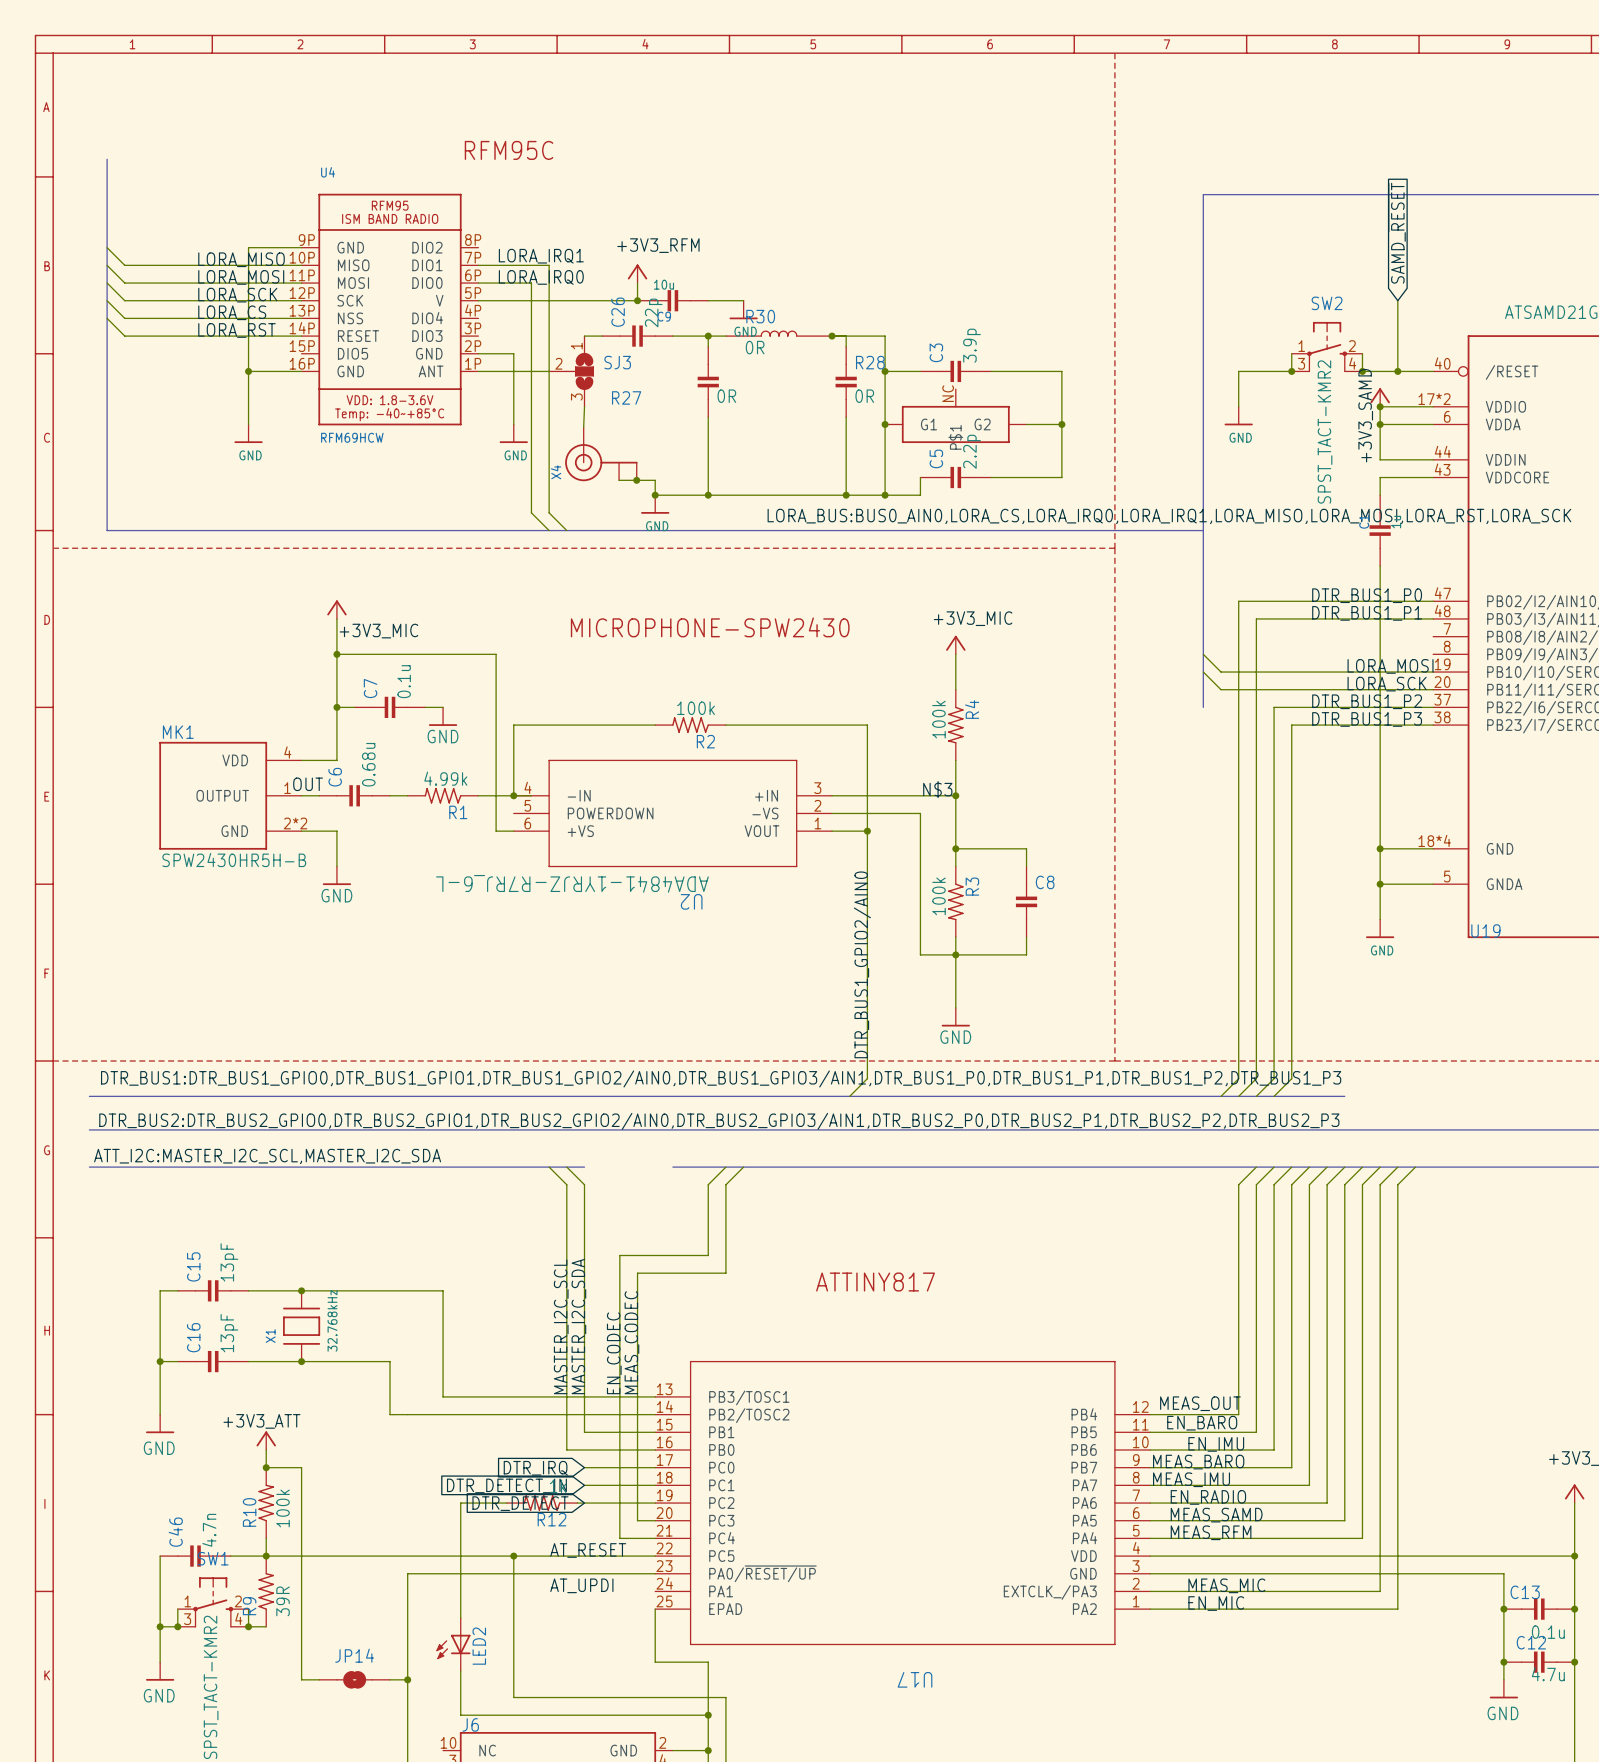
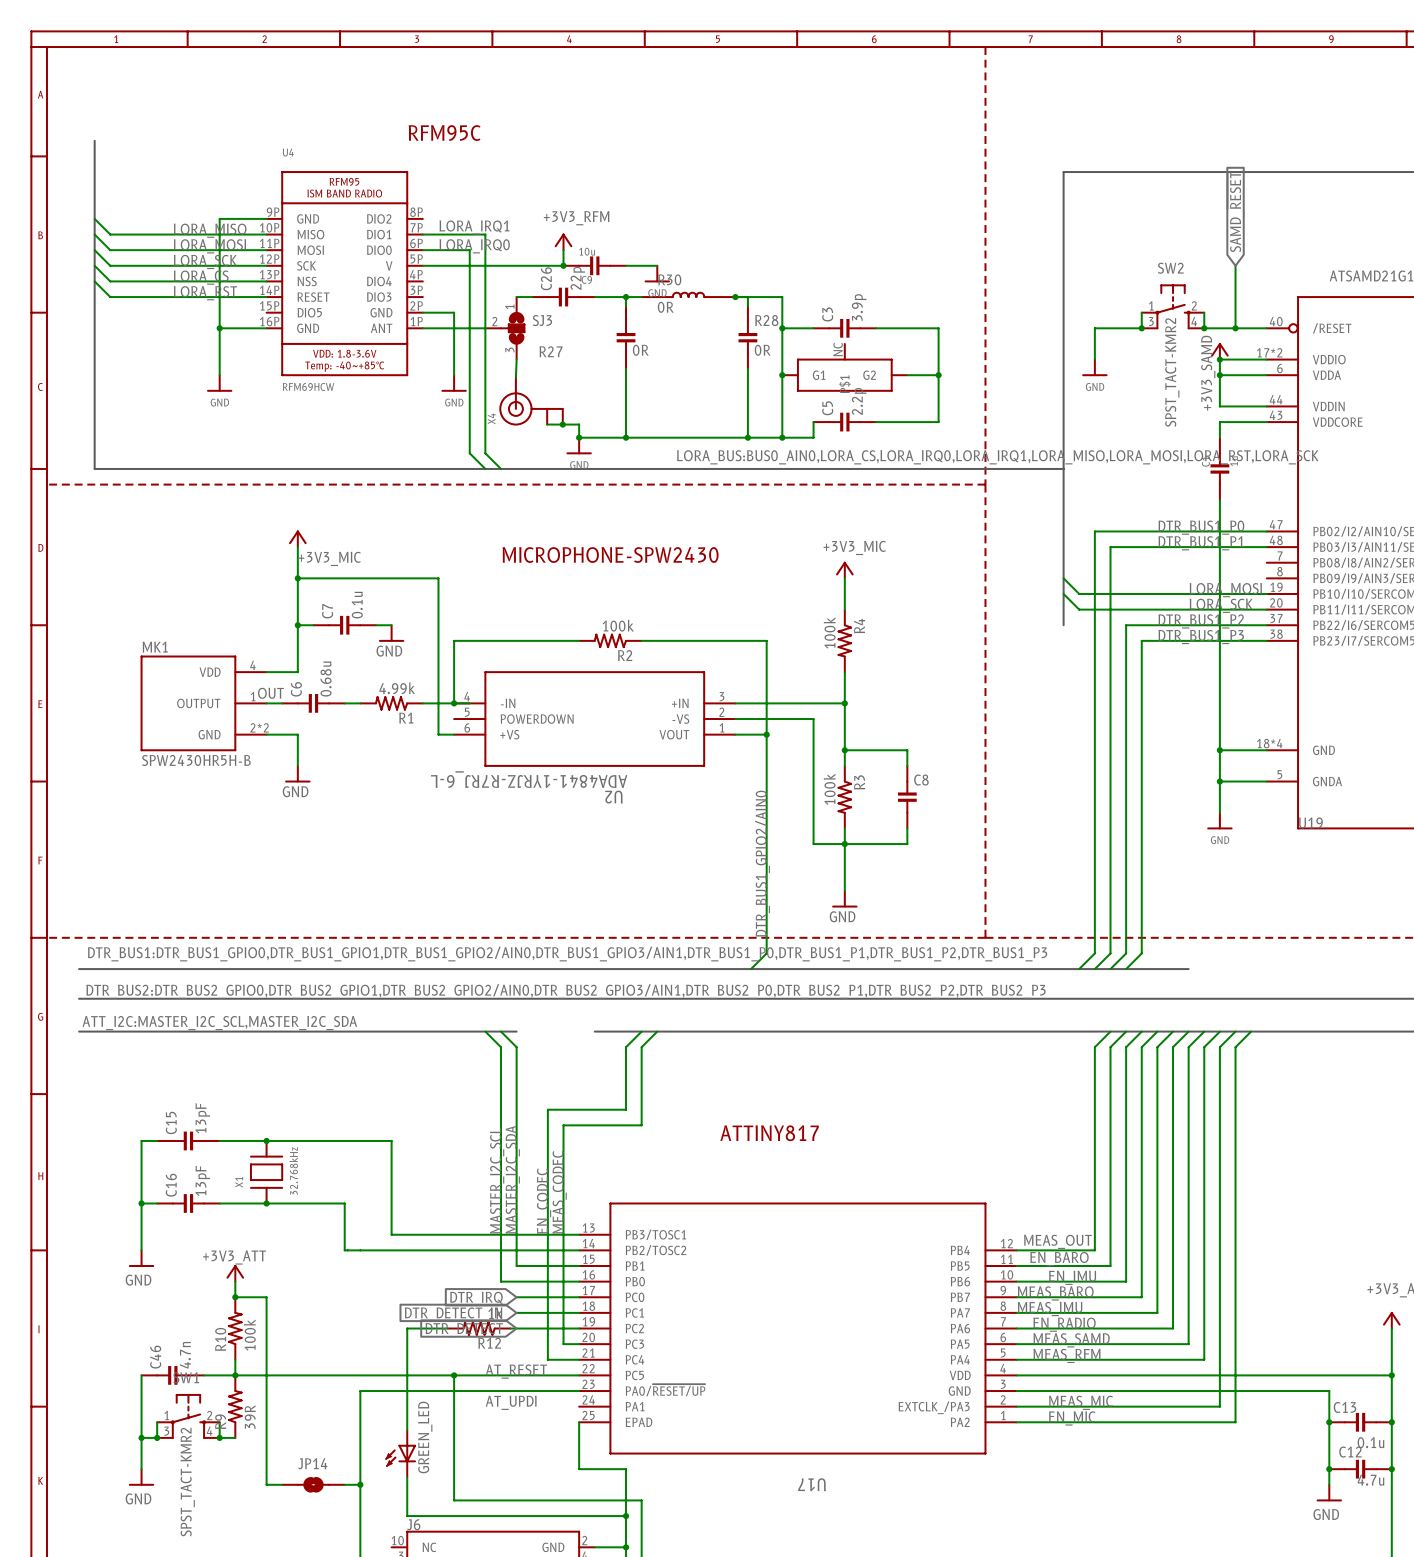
label: N$3 (937, 789) -> none
LED2 name: LED2 (479, 1646) -> GREEN_LED (425, 1437)

